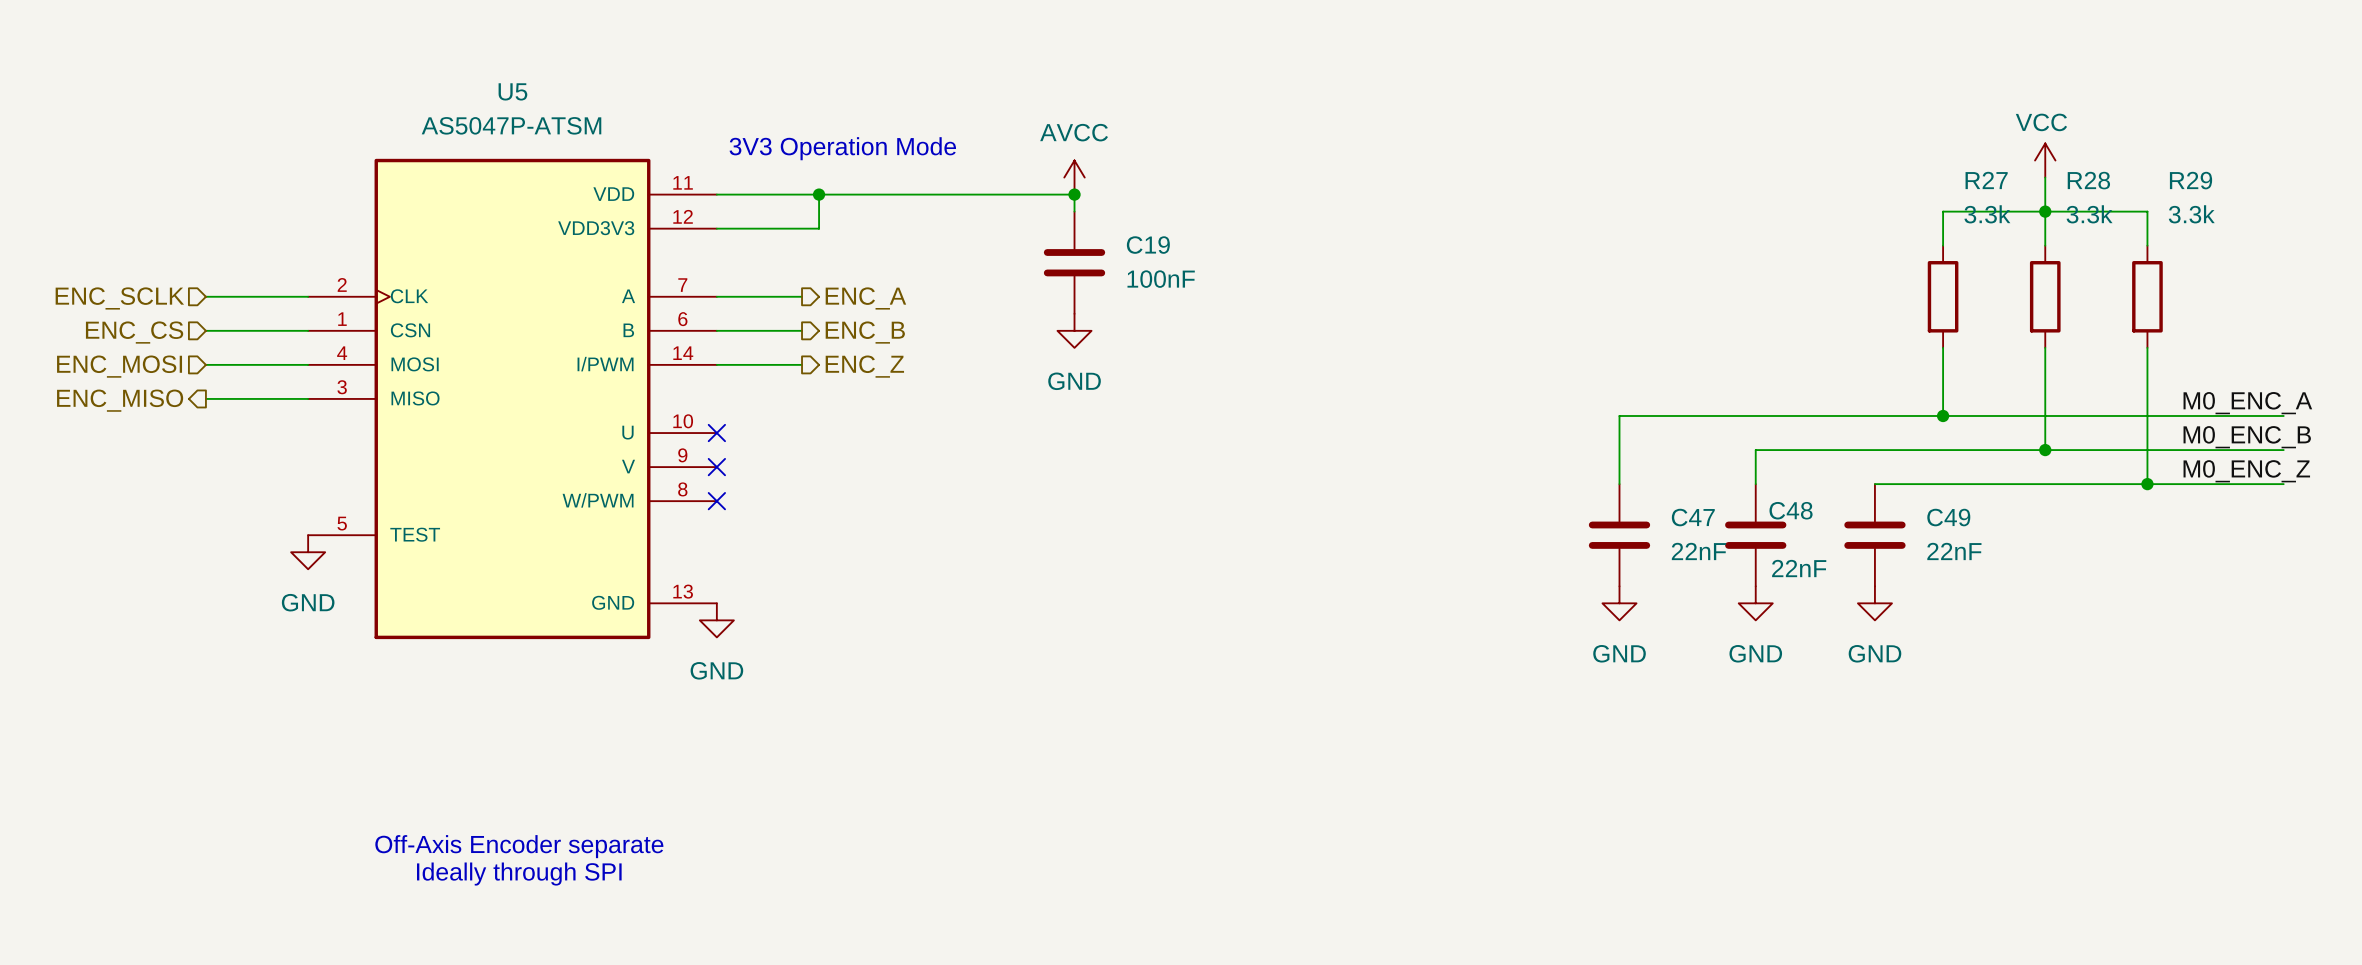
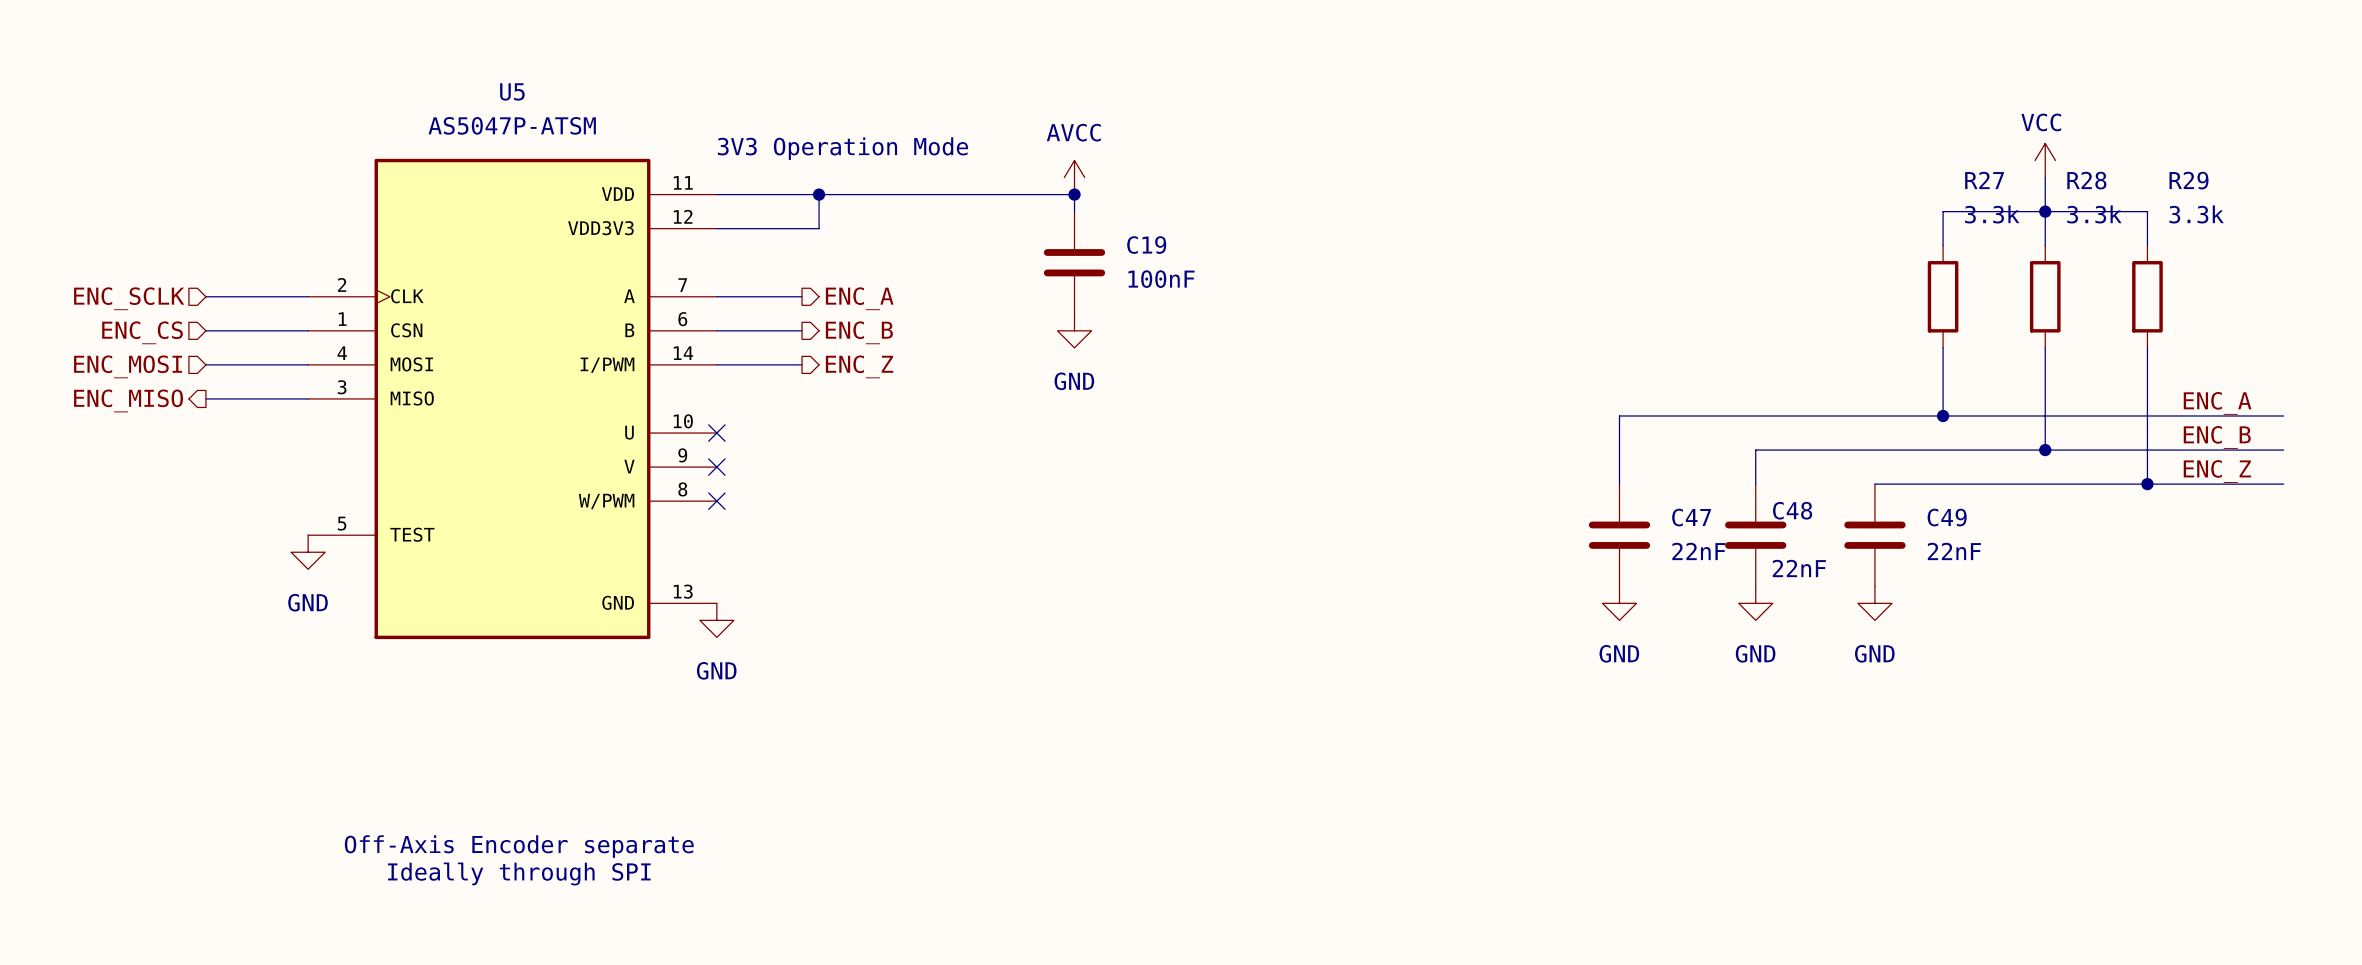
label: M0_ENC_A (2247, 403) -> ENC_A (2217, 403)
label: M0_ENC_B (2247, 437) -> ENC_B (2217, 437)
label: M0_ENC_Z (2246, 471) -> ENC_Z (2217, 471)

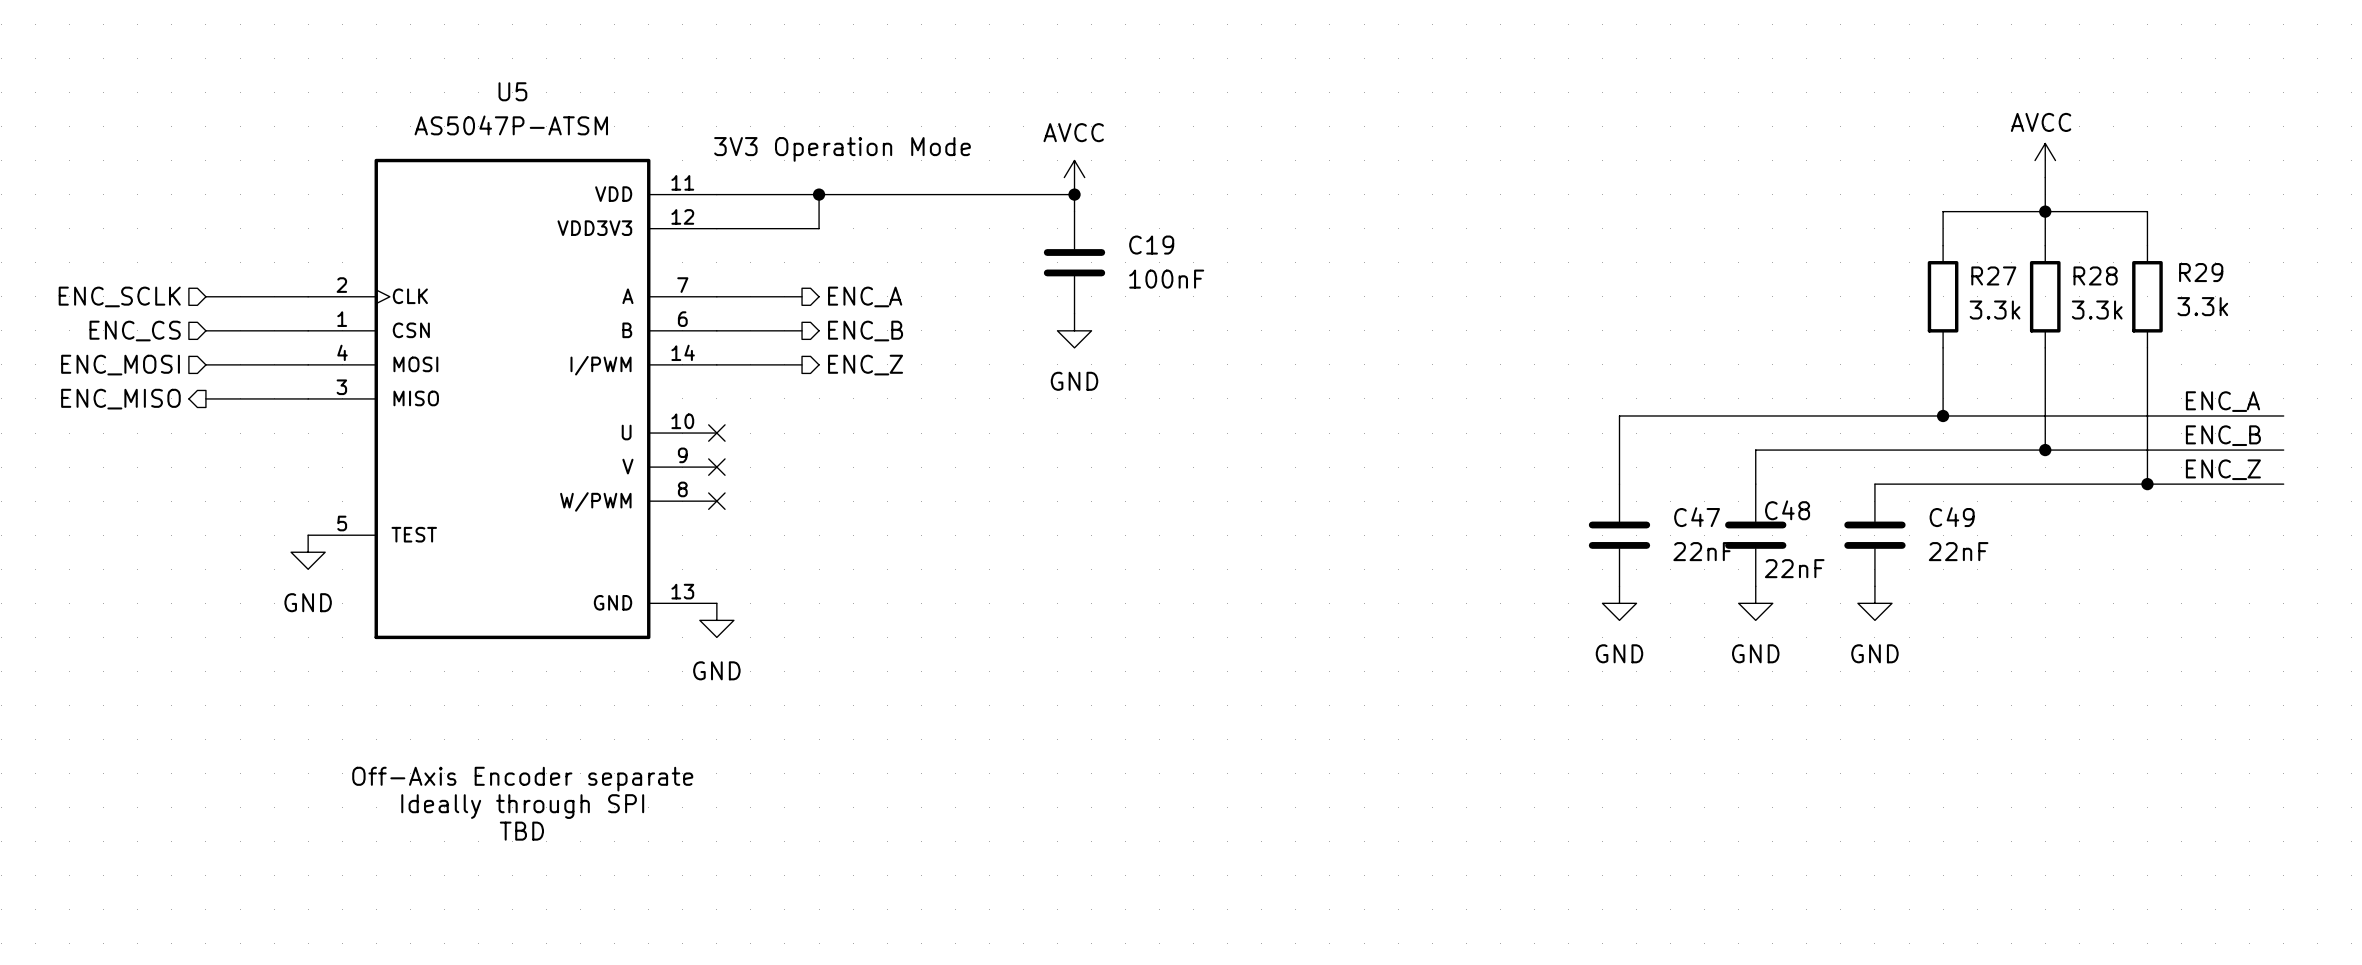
power symbol: VCC (2045, 160) -> AVCC (2045, 160)
R27 name position: R27 (1984, 180) -> R27 (1993, 275)
R28 name position: R28 (2086, 180) -> R28 (2095, 275)
R29 name position: R29 (2189, 180) -> R29 (2201, 272)
R27 value position: 3.3k (1992, 214) -> 3.3k (1995, 310)
R28 value position: 3.3k (2094, 214) -> 3.3k (2097, 310)
R29 value position: 3.3k (2196, 214) -> 3.3k (2202, 306)
text: none -> TBD (521, 831)
text position: Off-Axis Encoder separate (519, 846) -> Off-Axis Encoder separate (522, 779)
text position: Ideally through SPI (519, 874) -> Ideally through SPI (522, 806)

